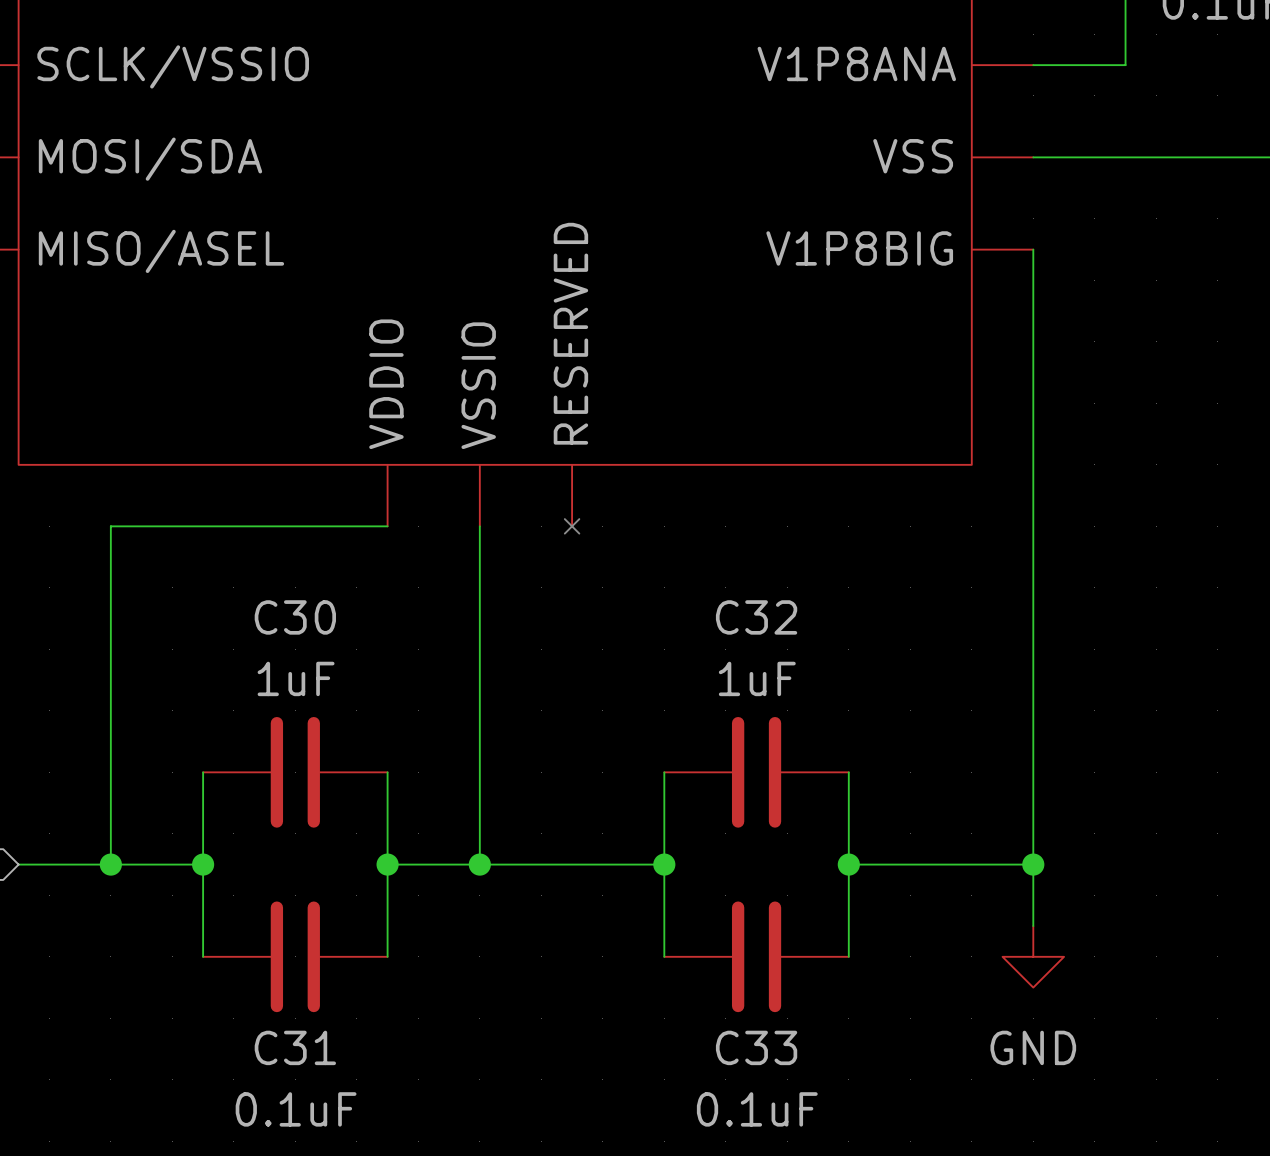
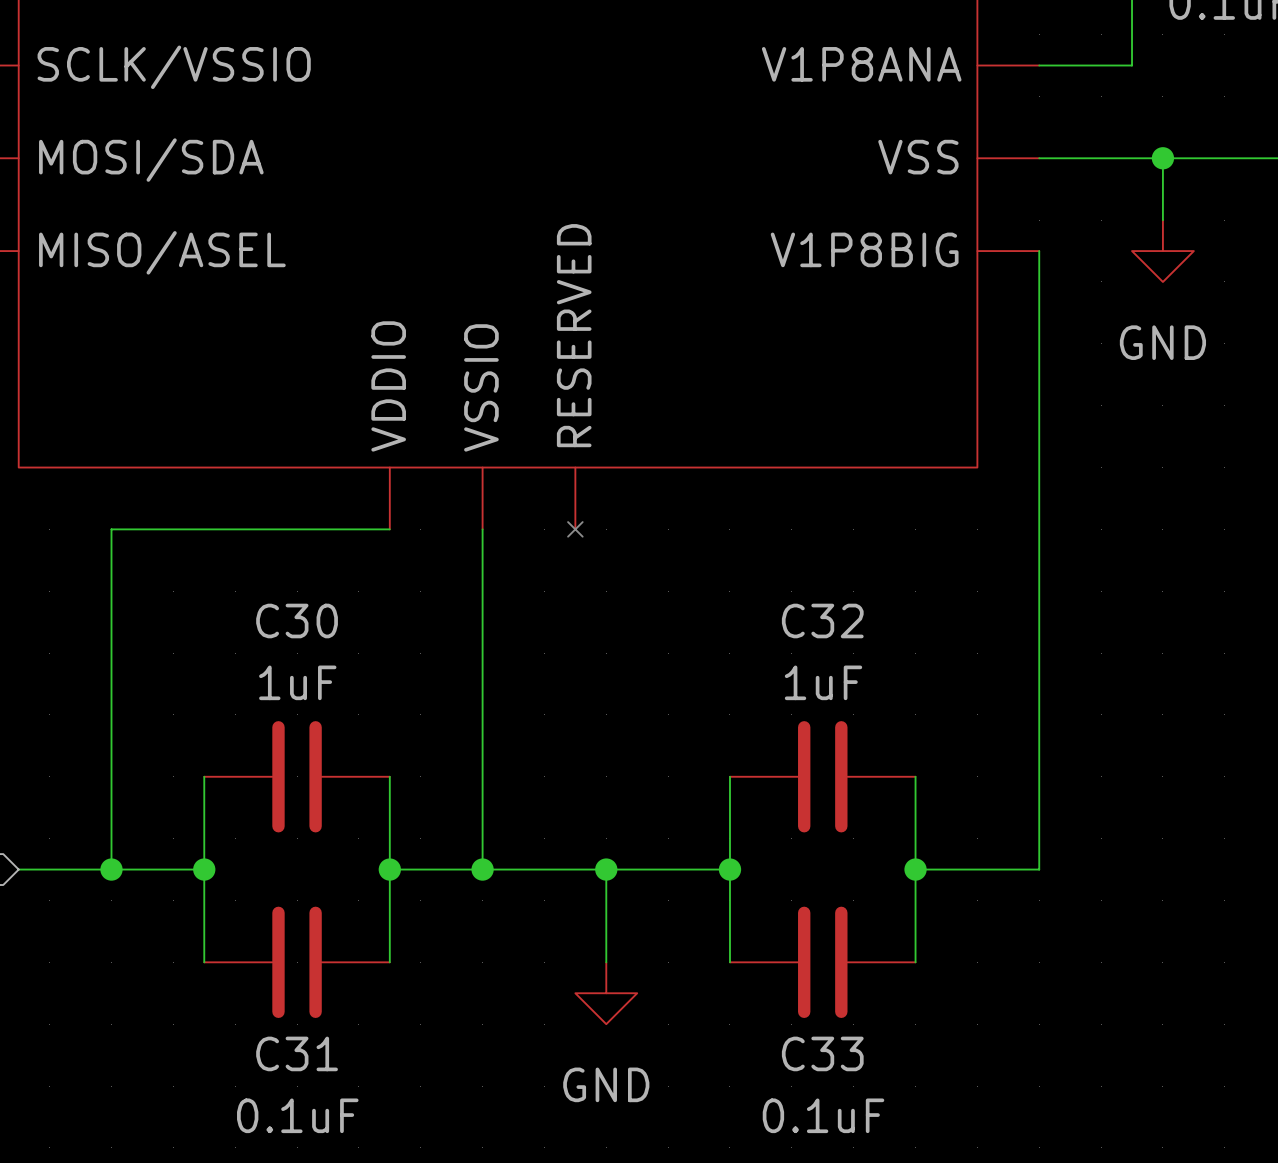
wire: none -> (1162, 158) (1162, 220)
junction: none -> (1162, 158)
power symbol: none -> GND (1162, 251)
wire: (664, 772) (664, 956) -> (729, 776) (729, 962)
C32 position: (756, 772) -> (822, 776)
wire: (848, 772) (848, 956) -> (915, 776) (915, 962)
wire: none -> (606, 869) (606, 962)
junction: none -> (606, 869)
junction: (664, 864) -> none
junction: none -> (729, 869)
wire: (848, 864) (910, 864) -> (668, 869) (729, 869)
junction: (848, 864) -> none
junction: none -> (915, 869)
wire: (1033, 864) (1033, 926) -> none
junction: (1033, 864) -> none
C33 position: (756, 956) -> (822, 962)
power symbol: GND (1033, 956) -> none
power symbol: none -> GND (606, 993)

